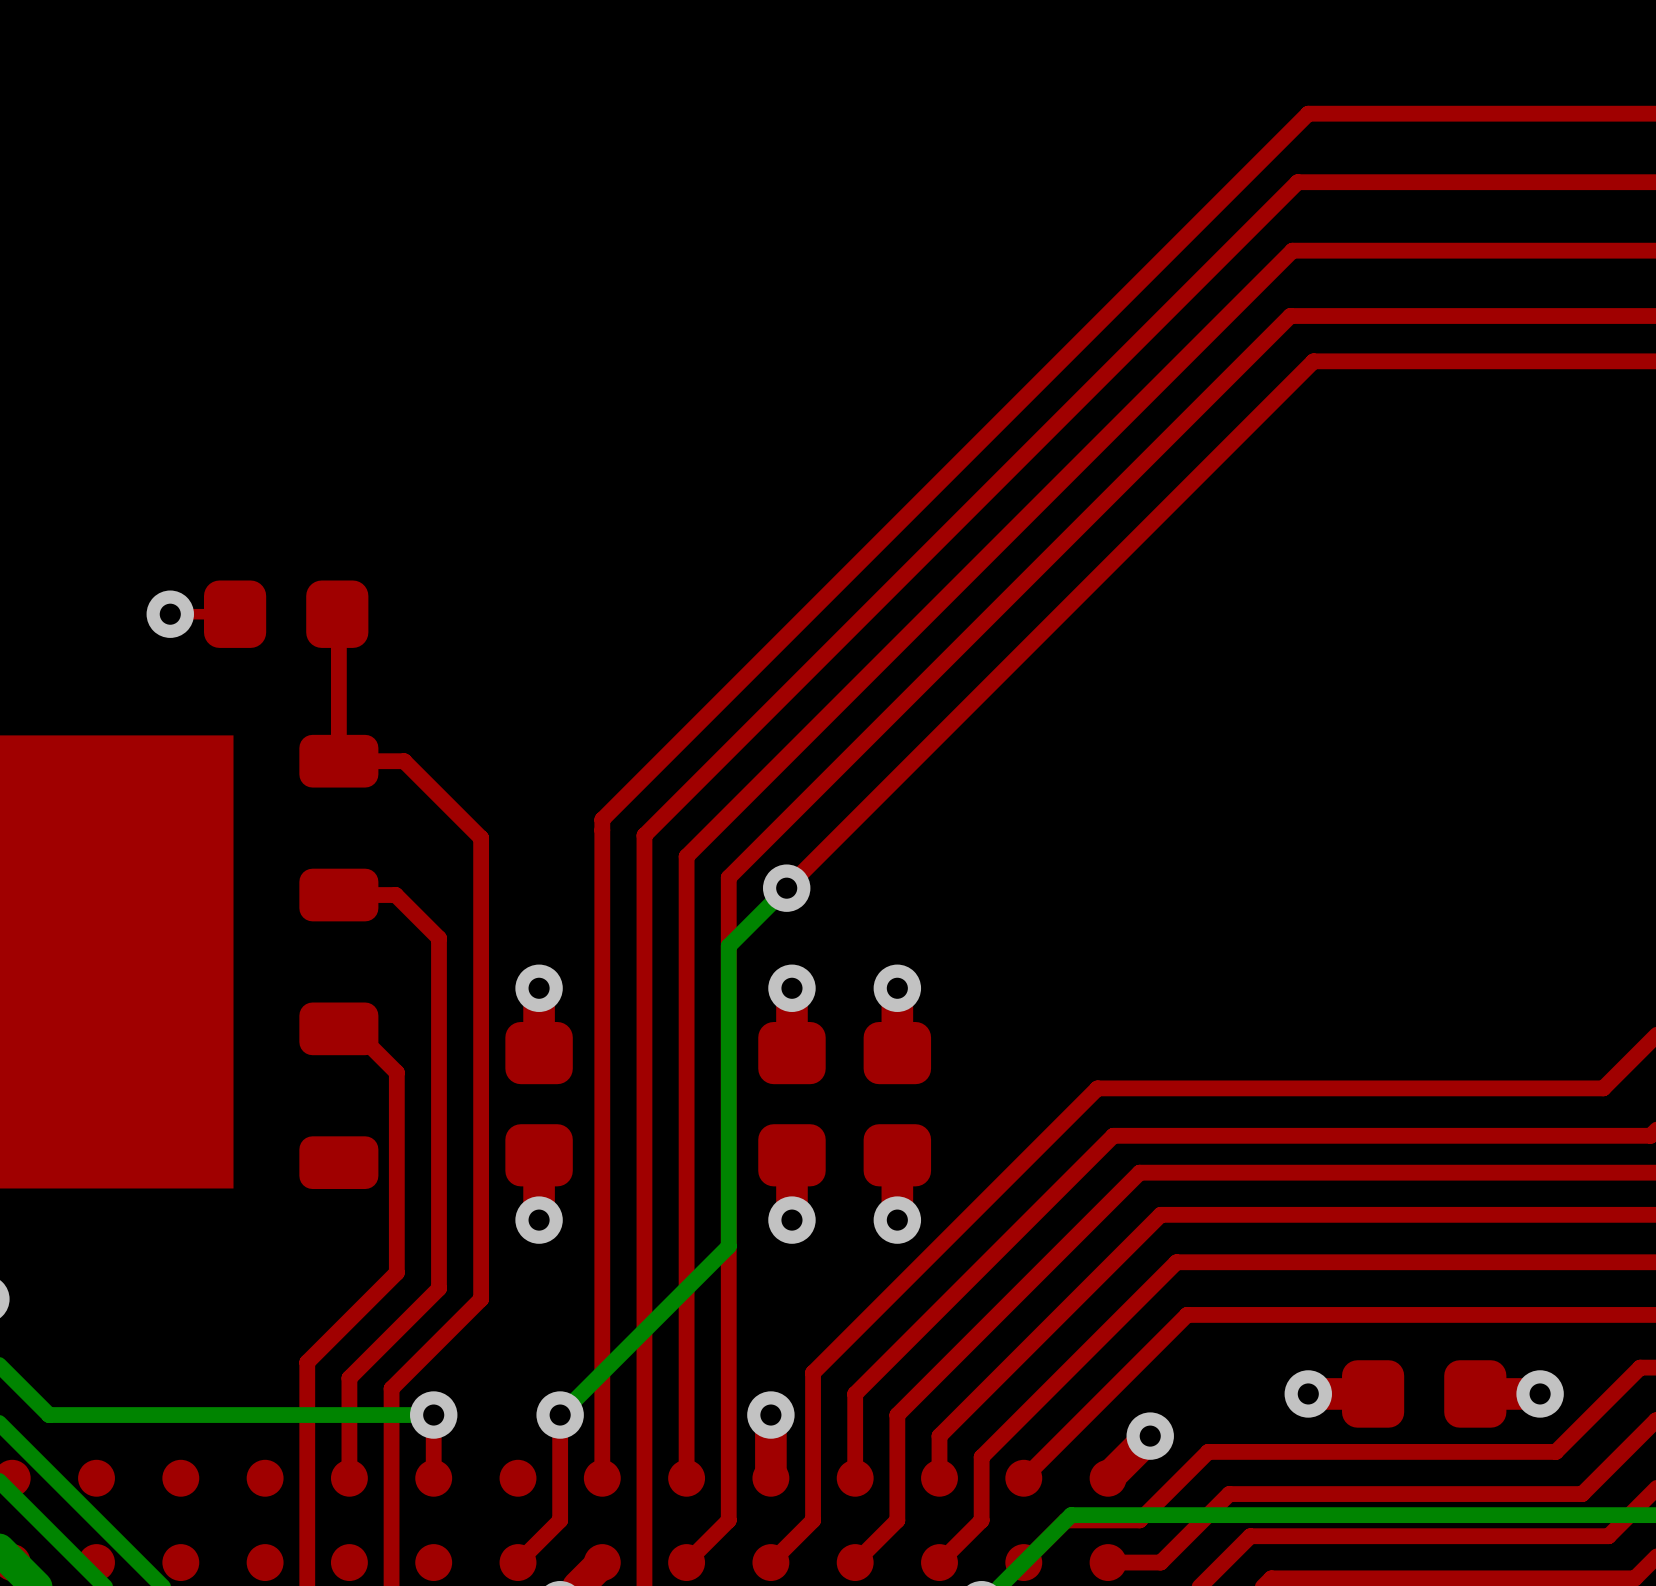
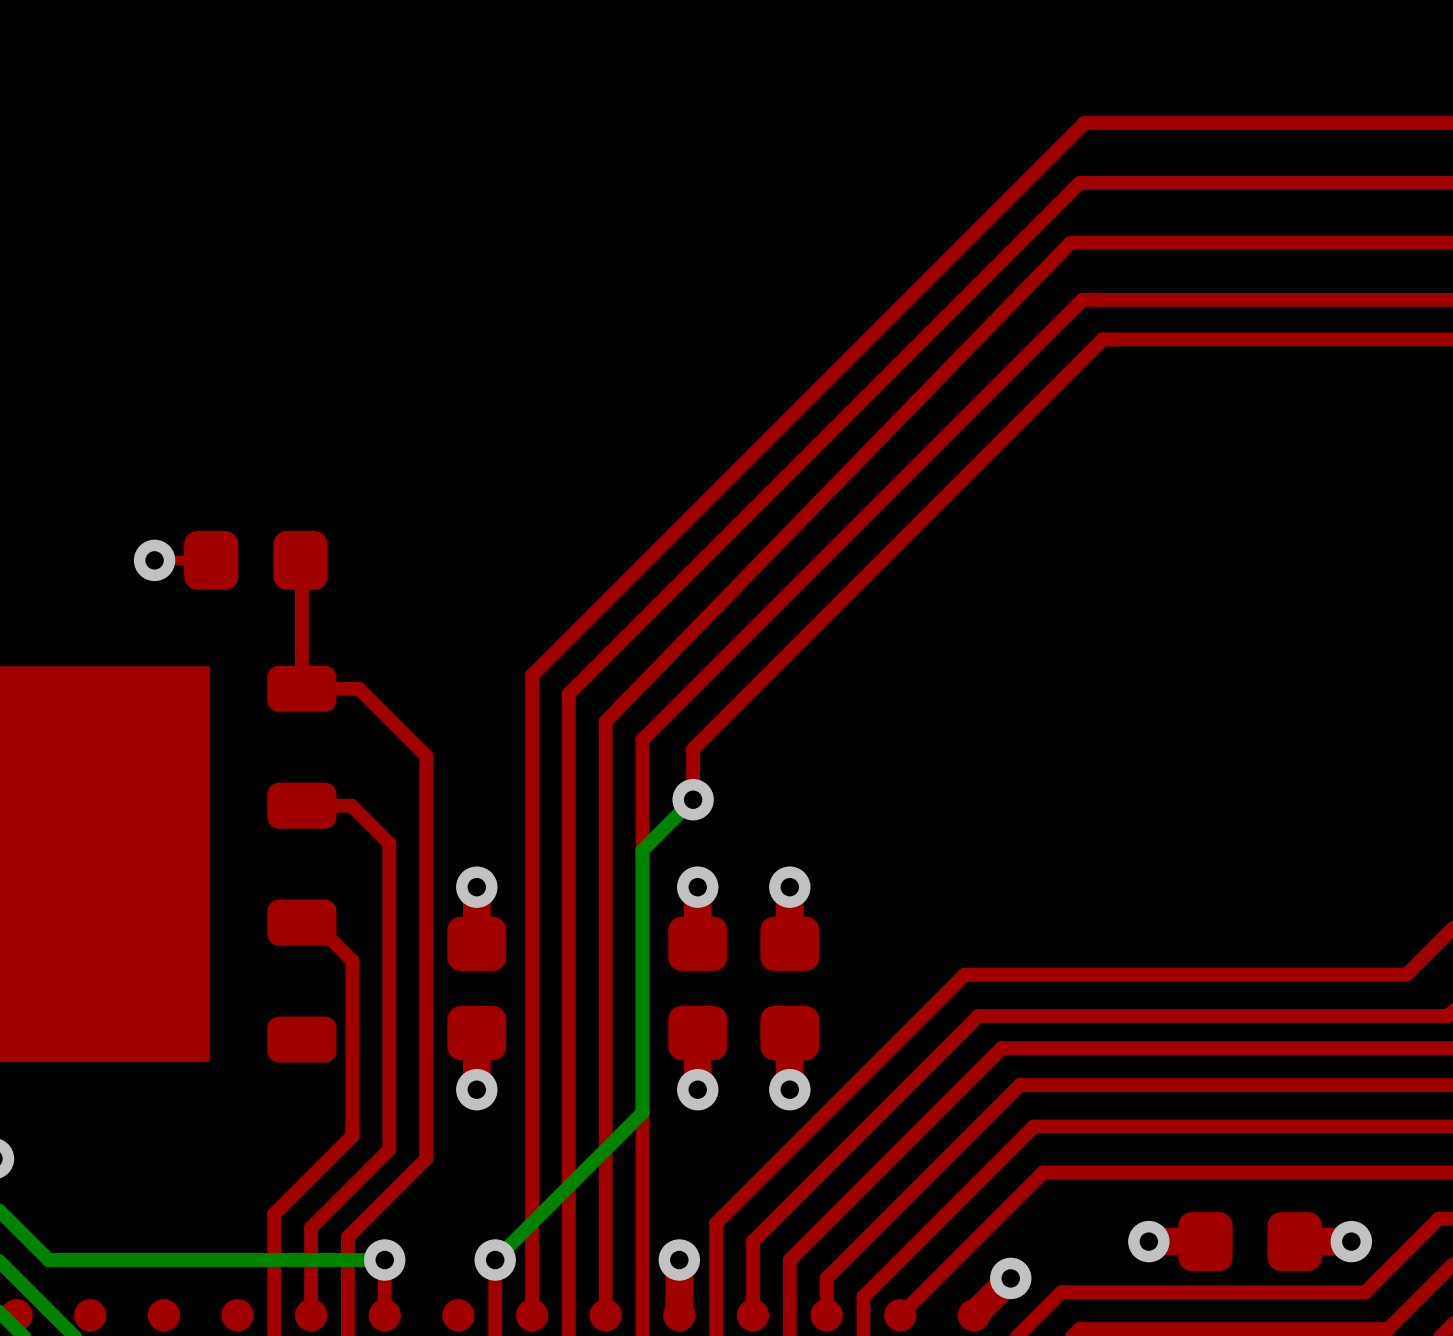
top track: (1308, 113) (602, 819) -> (1148, 123) (1084, 123) (532, 675) (532, 739)
top track: (1297, 182) (644, 835) -> (1139, 182) (1079, 182) (568, 693) (568, 753)
top track: (1292, 250) (686, 856) -> (1135, 242) (1070, 242) (605, 721) (605, 772)
top track: (1290, 316) (728, 877) -> (1133, 299) (1082, 299) (642, 739) (642, 790)
top track: (1313, 361) (786, 888) -> (1153, 339) (1102, 339) (693, 749) (693, 799)

